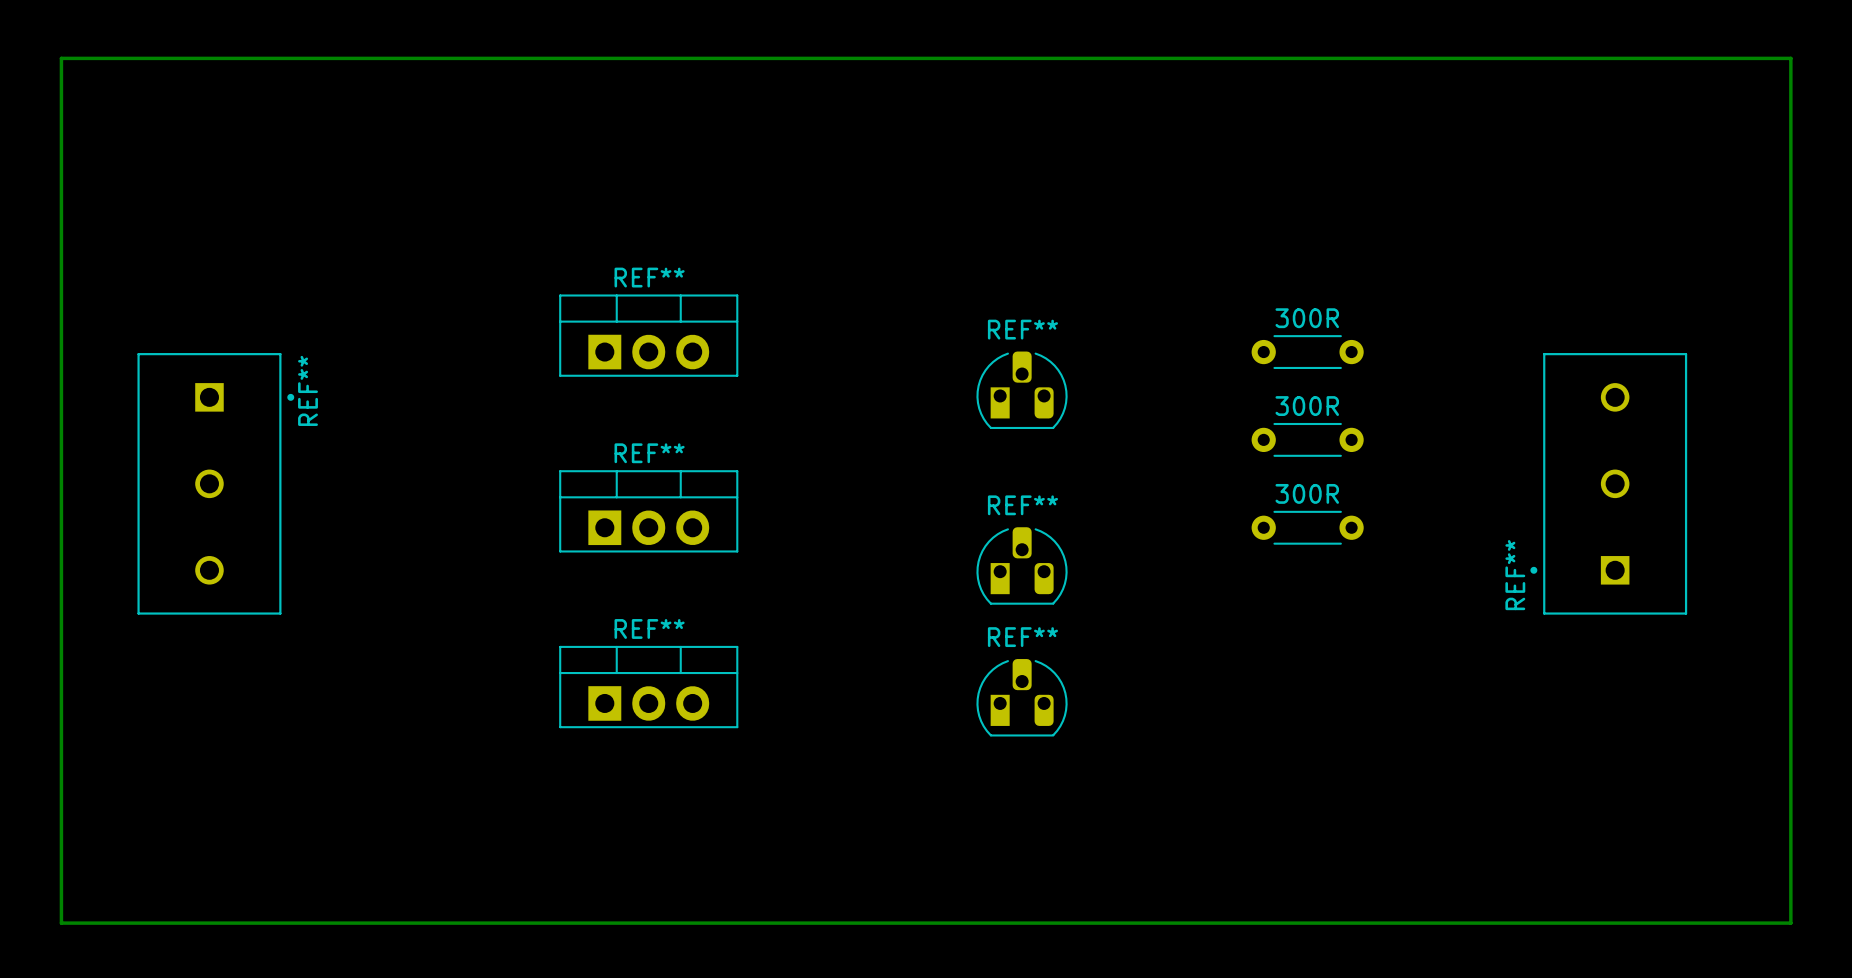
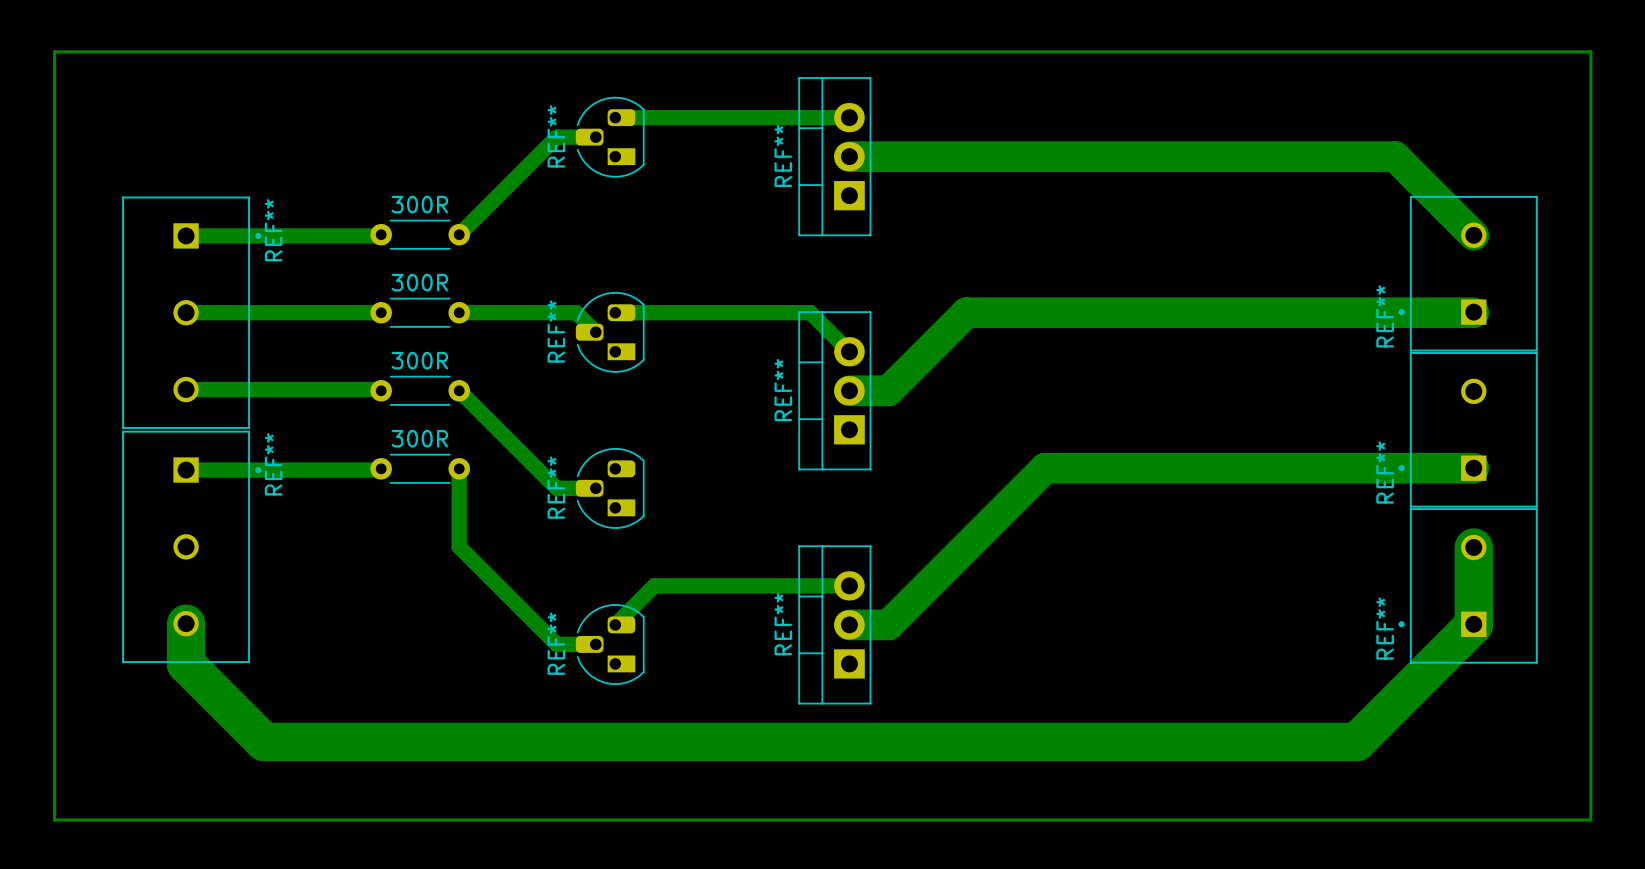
bottom track: none -> (615, 117) (849, 117)
bottom track: none -> (595, 137) (556, 137) (459, 234)
REF**: none -> (610, 137)
REF**: none -> (834, 156)
bottom track: none -> (849, 156) (1395, 156) (1473, 235)
bottom track: none -> (381, 234) (186, 235)
300R: none -> (420, 234)
REF**: none -> (1468, 273)
REF**: (648, 335) -> none
bottom track: none -> (186, 312) (381, 312)
REF**: none -> (191, 312)
300R: none -> (420, 312)
bottom track: none -> (459, 312) (576, 312) (595, 332)
bottom track: none -> (615, 312) (810, 312) (849, 351)
300R: (1307, 352) -> none
bottom track: none -> (1473, 312) (966, 312) (888, 390) (849, 390)
REF**: none -> (610, 332)
REF**: (1022, 390) -> none
bottom track: none -> (186, 389) (381, 390)
300R: none -> (420, 390)
bottom track: none -> (459, 390) (556, 488) (595, 488)
REF**: none -> (834, 390)
300R: (1307, 439) -> none
REF**: (215, 483) -> none
REF**: (1608, 483) -> none
REF**: none -> (1468, 429)
REF**: (648, 511) -> none
bottom track: none -> (381, 468) (186, 470)
300R: none -> (420, 468)
bottom track: none -> (459, 468) (459, 546) (556, 644) (595, 644)
300R: (1307, 527) -> none
bottom track: none -> (1473, 468) (1045, 468) (888, 624) (849, 624)
REF**: none -> (610, 488)
REF**: (1022, 565) -> none
REF**: none -> (191, 546)
bottom track: none -> (1473, 547) (1473, 624) (1356, 741) (264, 741) (186, 663) (186, 623)
bottom track: none -> (849, 585) (654, 585) (615, 624)
REF**: none -> (1468, 585)
REF**: (648, 687) -> none
REF**: (1022, 697) -> none
REF**: none -> (834, 624)
REF**: none -> (610, 644)

